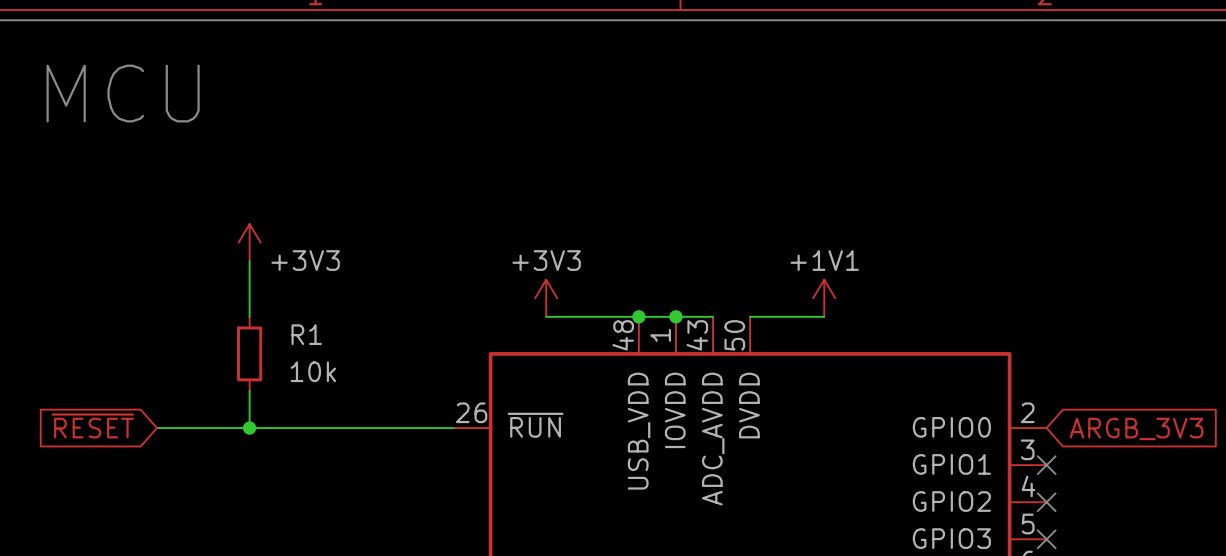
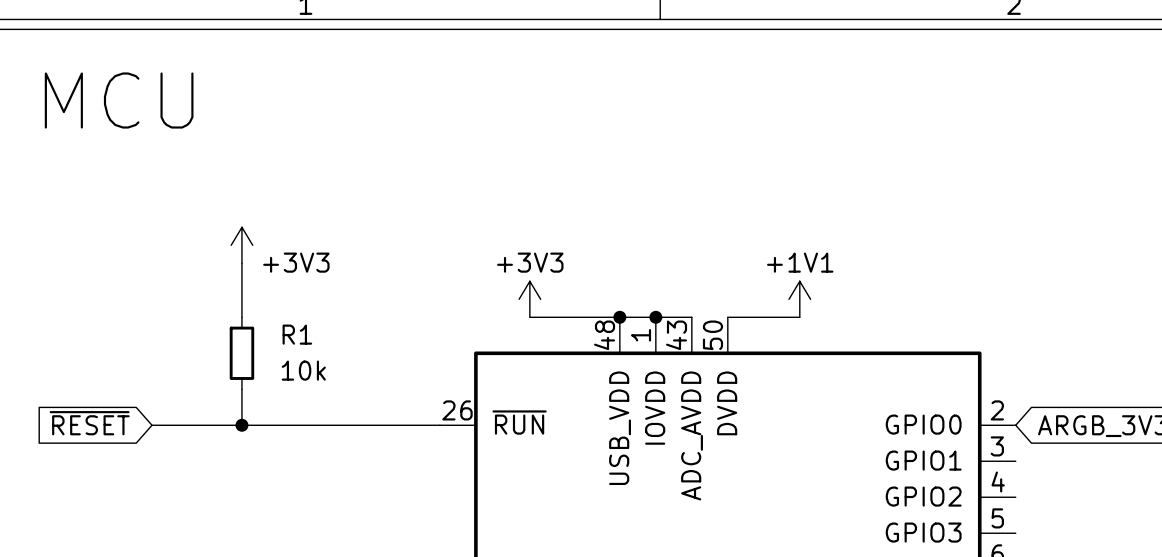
no-connect mark: (1046, 465) -> none
no-connect mark: (1046, 502) -> none
no-connect mark: (1046, 539) -> none

